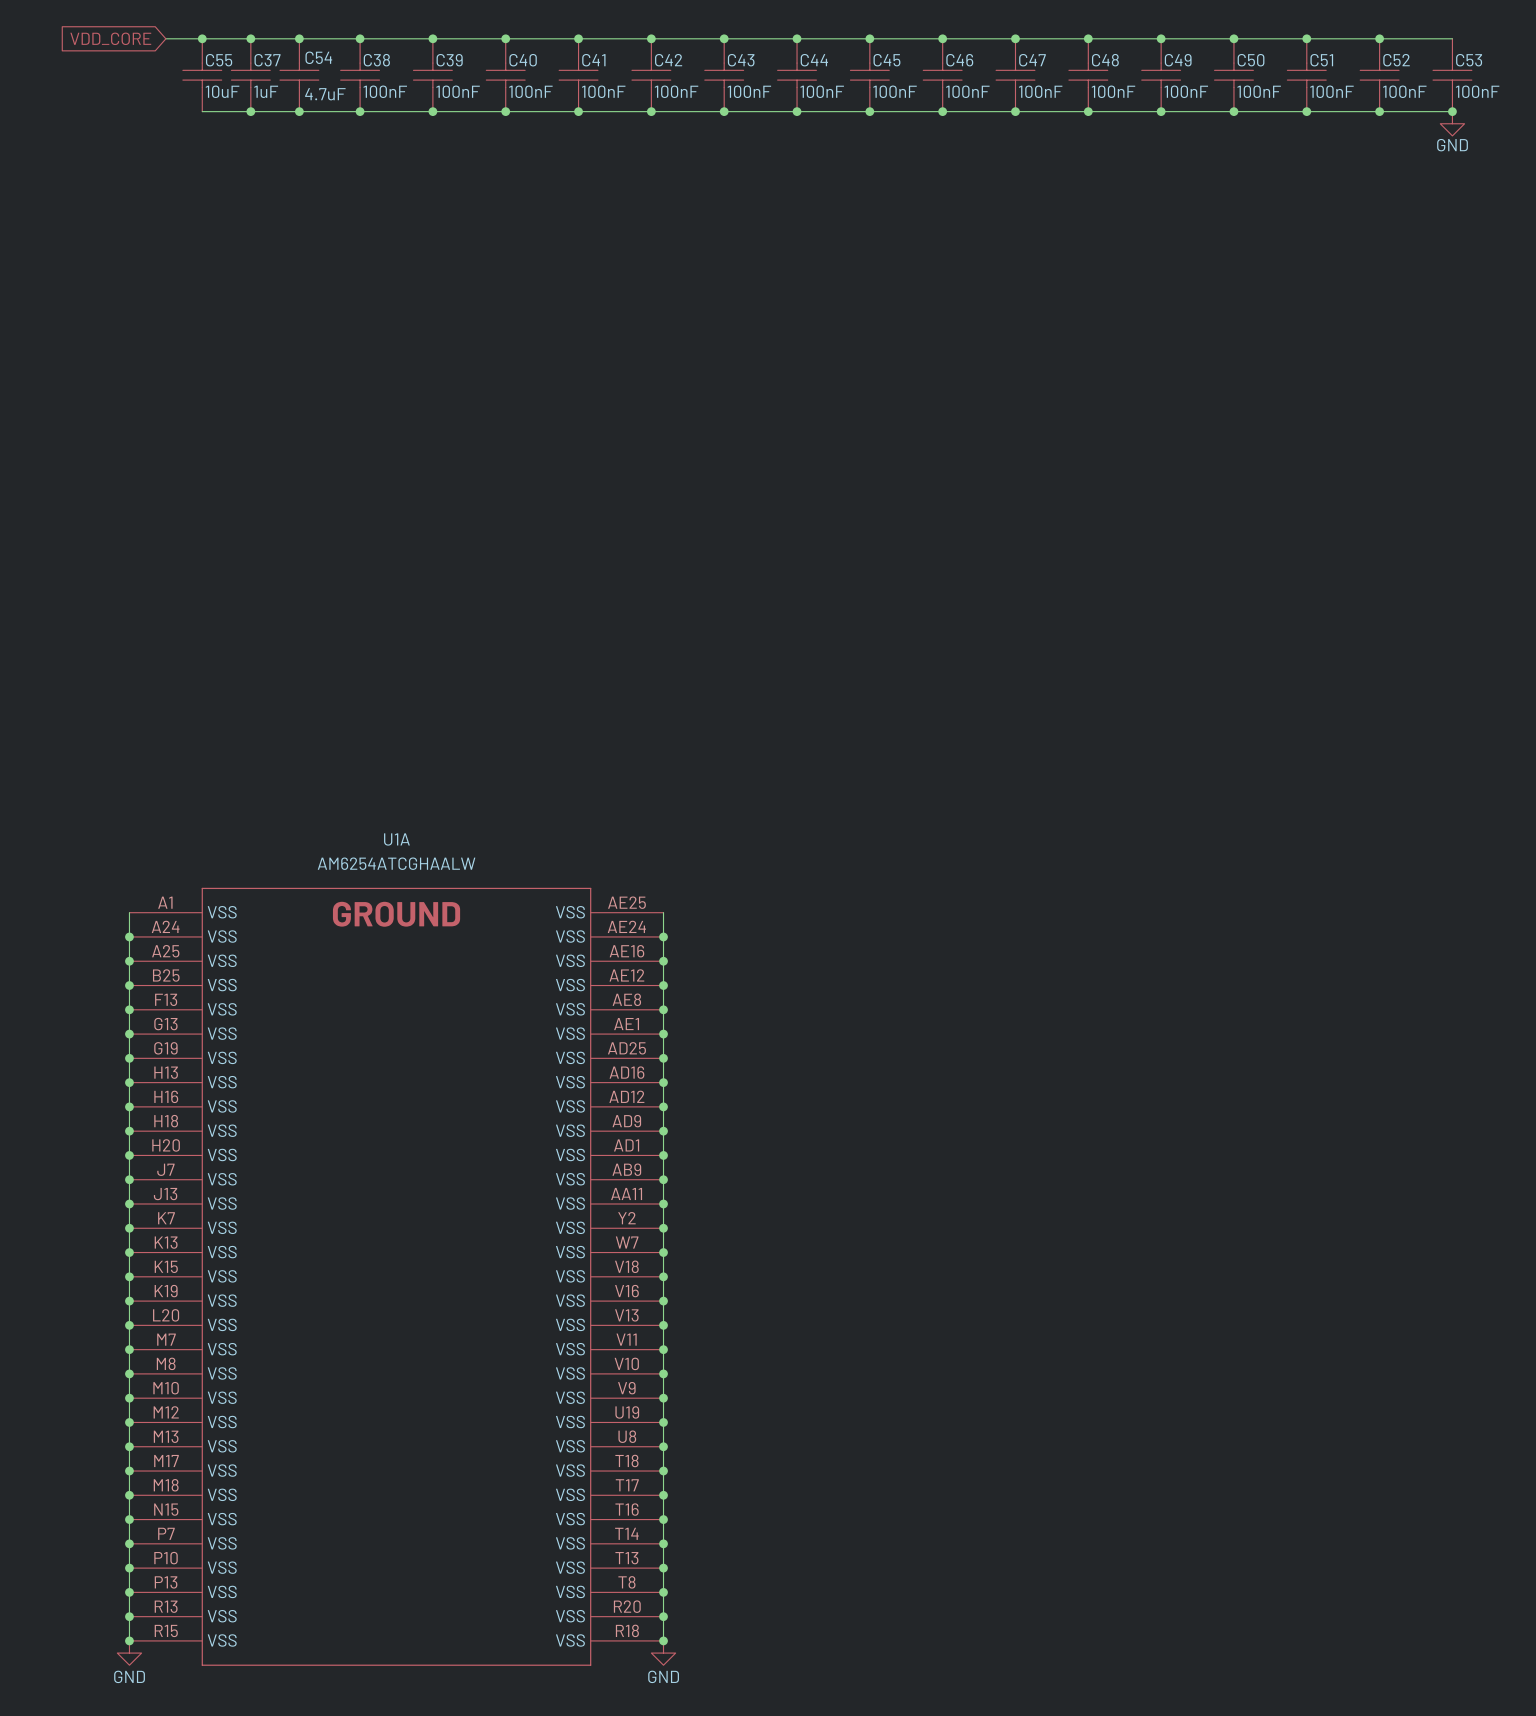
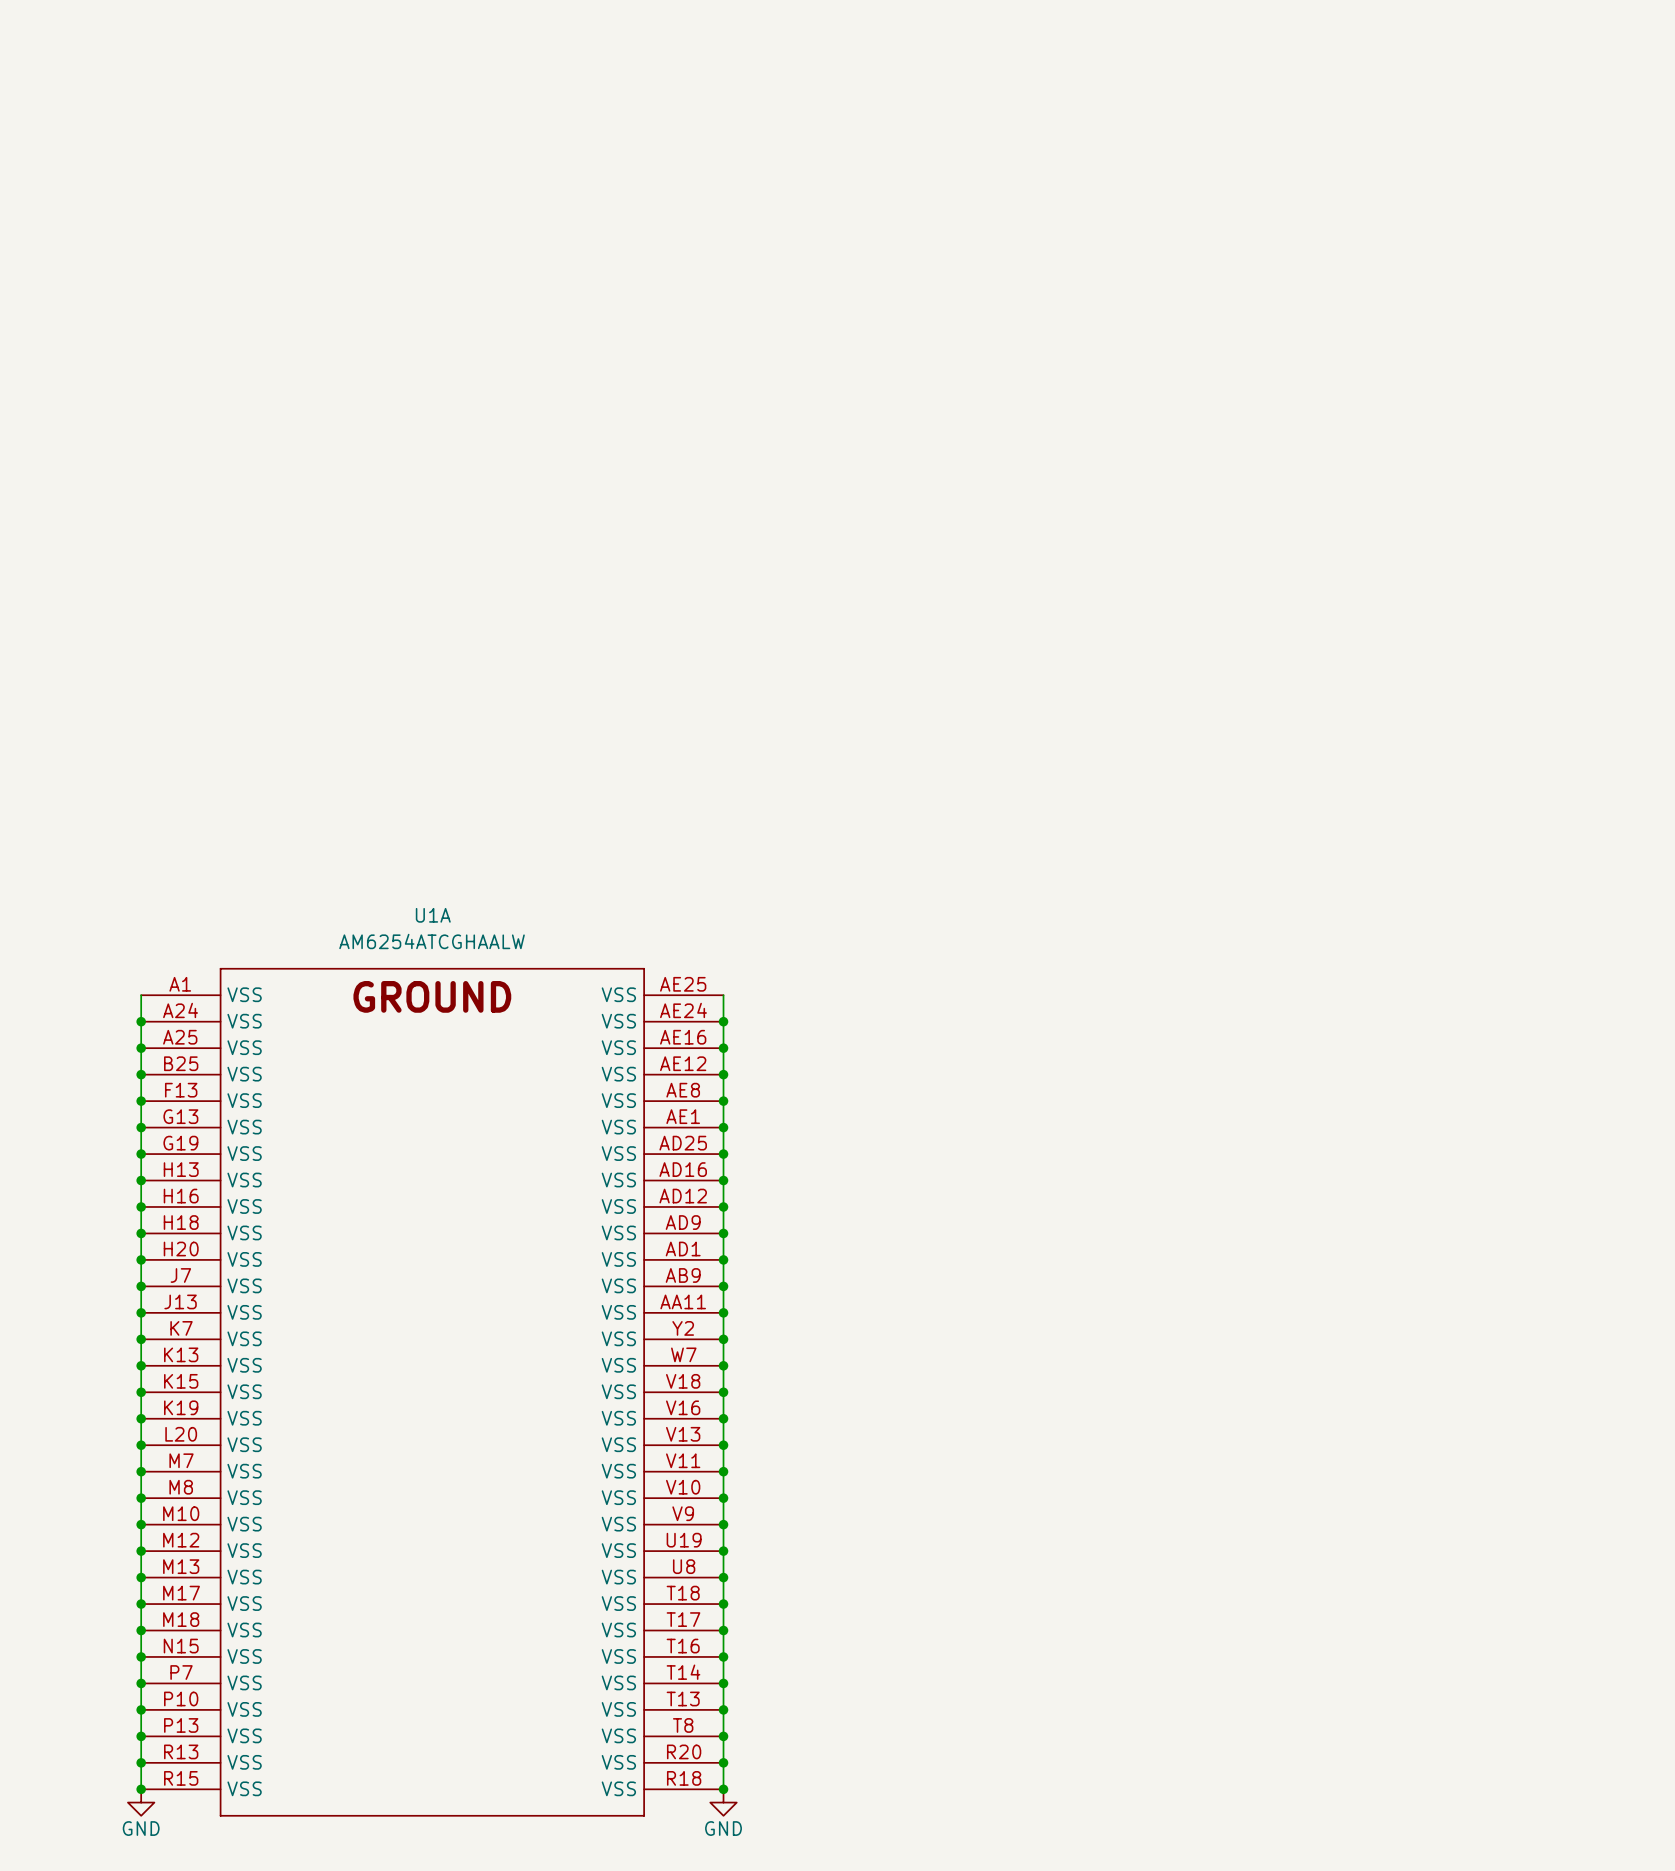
global label: VDD_CORE (110, 38) -> none
wire: (165, 38) (1452, 38) -> none
junction: (202, 38) -> none
junction: (250, 38) -> none
junction: (299, 38) -> none
junction: (360, 38) -> none
junction: (432, 38) -> none
junction: (505, 38) -> none
junction: (578, 38) -> none
junction: (651, 38) -> none
junction: (724, 38) -> none
junction: (797, 38) -> none
junction: (869, 38) -> none
junction: (942, 38) -> none
junction: (1015, 38) -> none
junction: (1088, 38) -> none
junction: (1161, 38) -> none
junction: (1233, 38) -> none
junction: (1306, 38) -> none
junction: (1379, 38) -> none
C55: (202, 75) -> none
C37: (250, 75) -> none
C54: (299, 75) -> none
C38: (360, 75) -> none
C39: (432, 75) -> none
C40: (505, 75) -> none
C41: (578, 75) -> none
C42: (651, 75) -> none
C43: (724, 75) -> none
C44: (797, 75) -> none
C45: (869, 75) -> none
C46: (942, 75) -> none
C47: (1015, 75) -> none
C48: (1088, 75) -> none
C49: (1161, 75) -> none
C50: (1233, 75) -> none
C51: (1306, 75) -> none
C52: (1379, 75) -> none
C53: (1452, 75) -> none
wire: (202, 111) (1452, 111) -> none
junction: (250, 111) -> none
junction: (299, 111) -> none
junction: (360, 111) -> none
junction: (432, 111) -> none
junction: (505, 111) -> none
junction: (578, 111) -> none
junction: (651, 111) -> none
junction: (724, 111) -> none
junction: (797, 111) -> none
junction: (869, 111) -> none
junction: (942, 111) -> none
junction: (1015, 111) -> none
junction: (1088, 111) -> none
junction: (1161, 111) -> none
junction: (1233, 111) -> none
junction: (1306, 111) -> none
junction: (1379, 111) -> none
junction: (1452, 111) -> none
power symbol: GND (1452, 123) -> none

